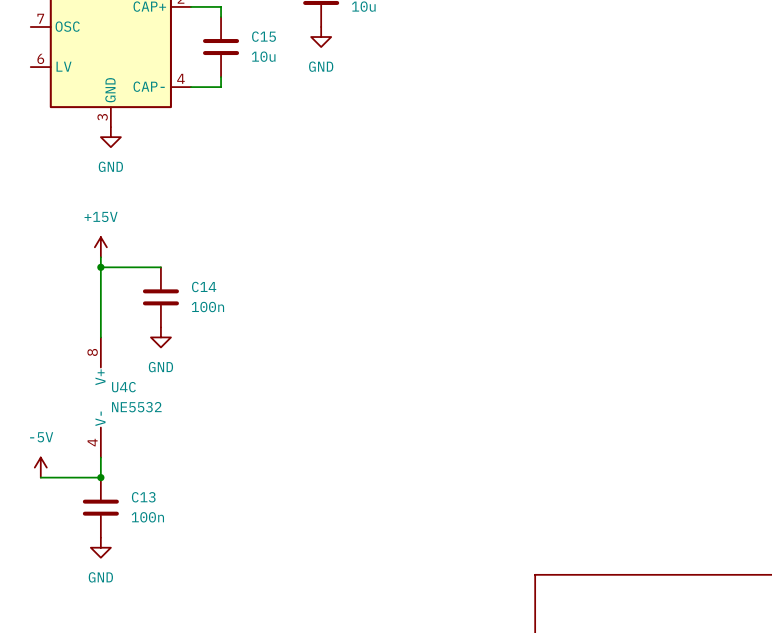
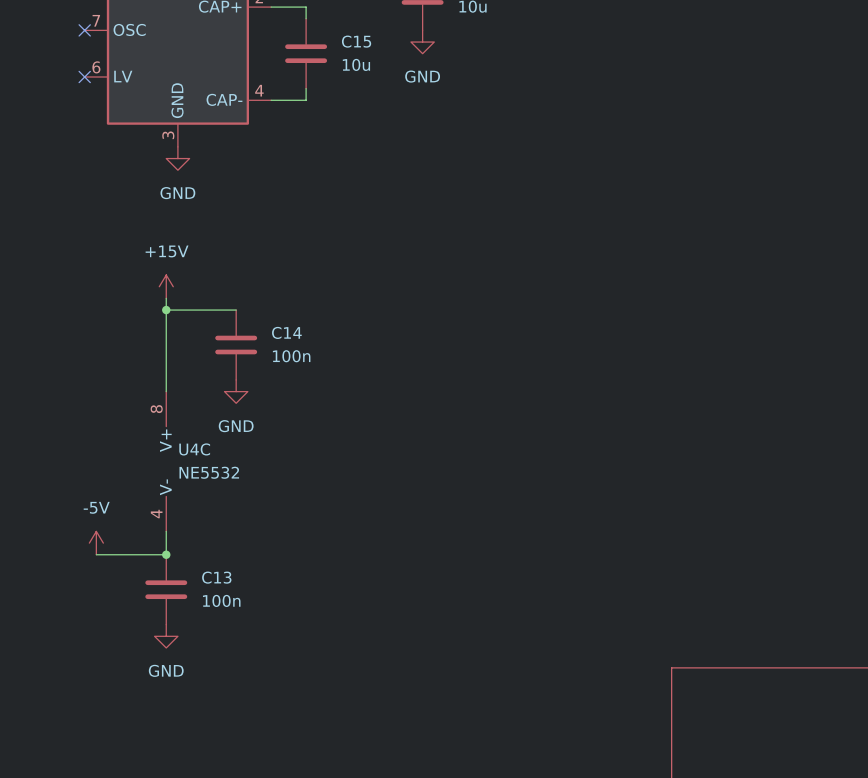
no-connect mark: none -> (84, 30)
no-connect mark: none -> (84, 76)

